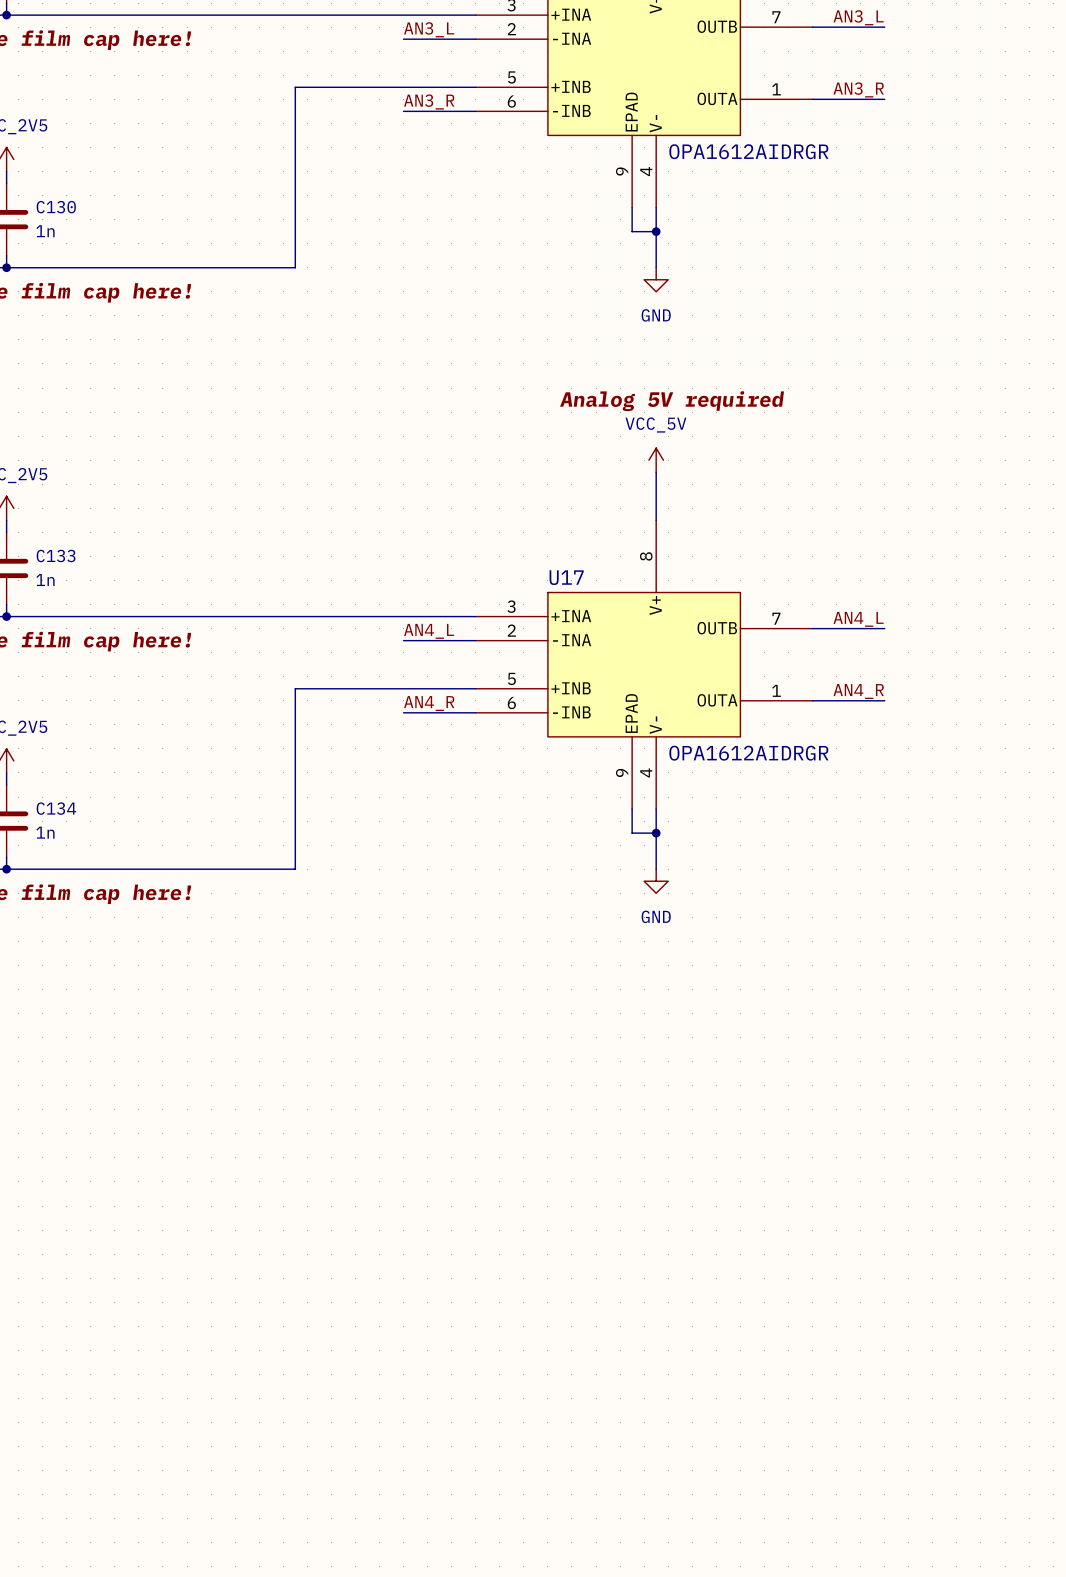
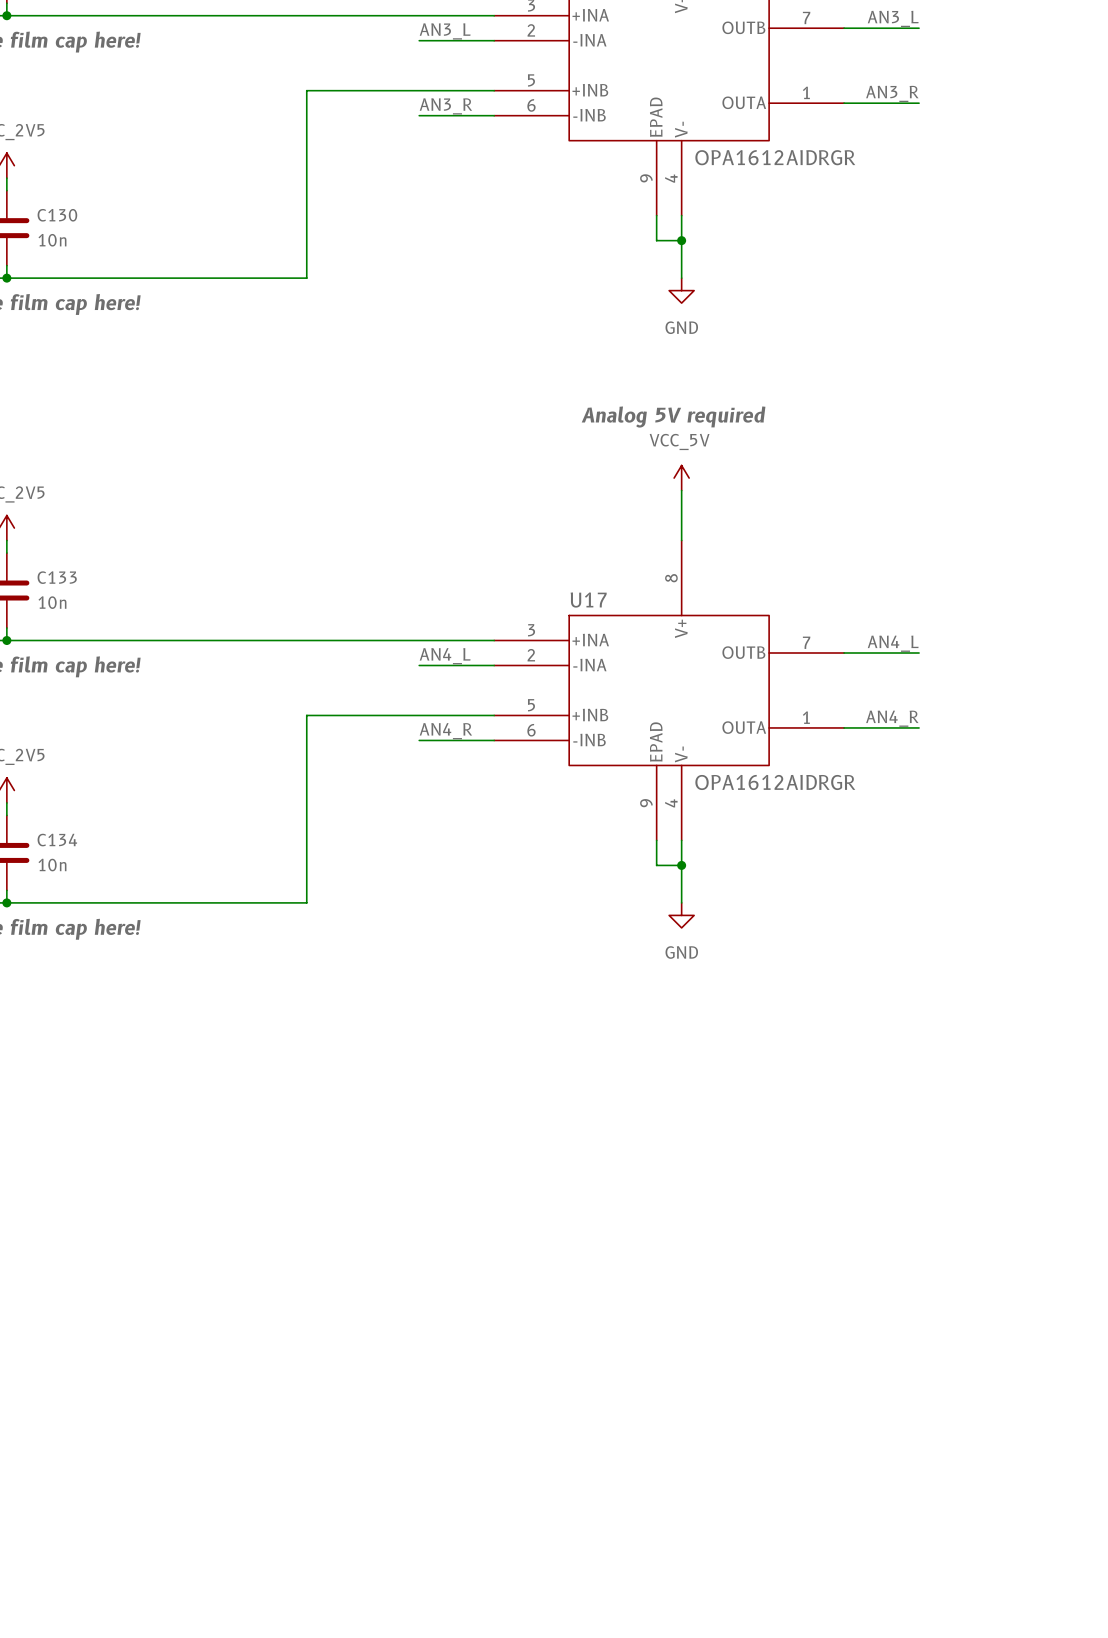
C130 value: 1n (45, 231) -> 10n (52, 240)
C133 value: 1n (45, 580) -> 10n (52, 602)
C134 value: 1n (45, 832) -> 10n (52, 865)

